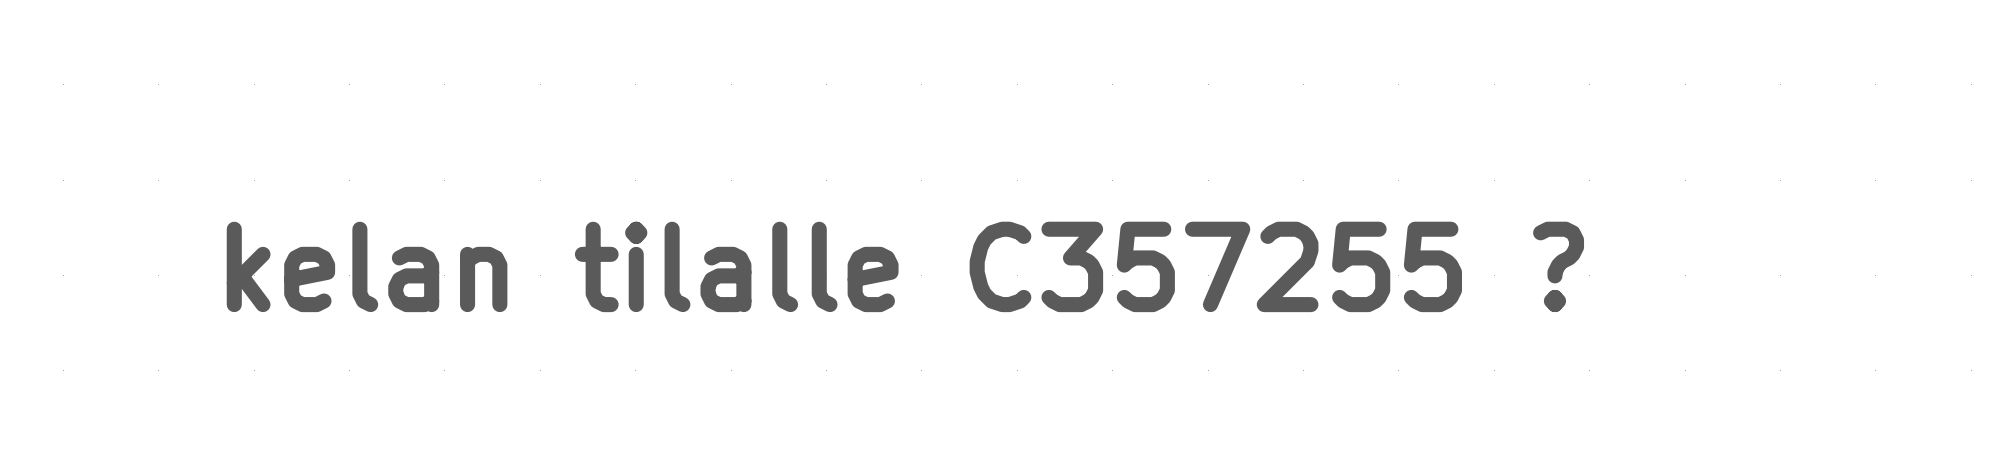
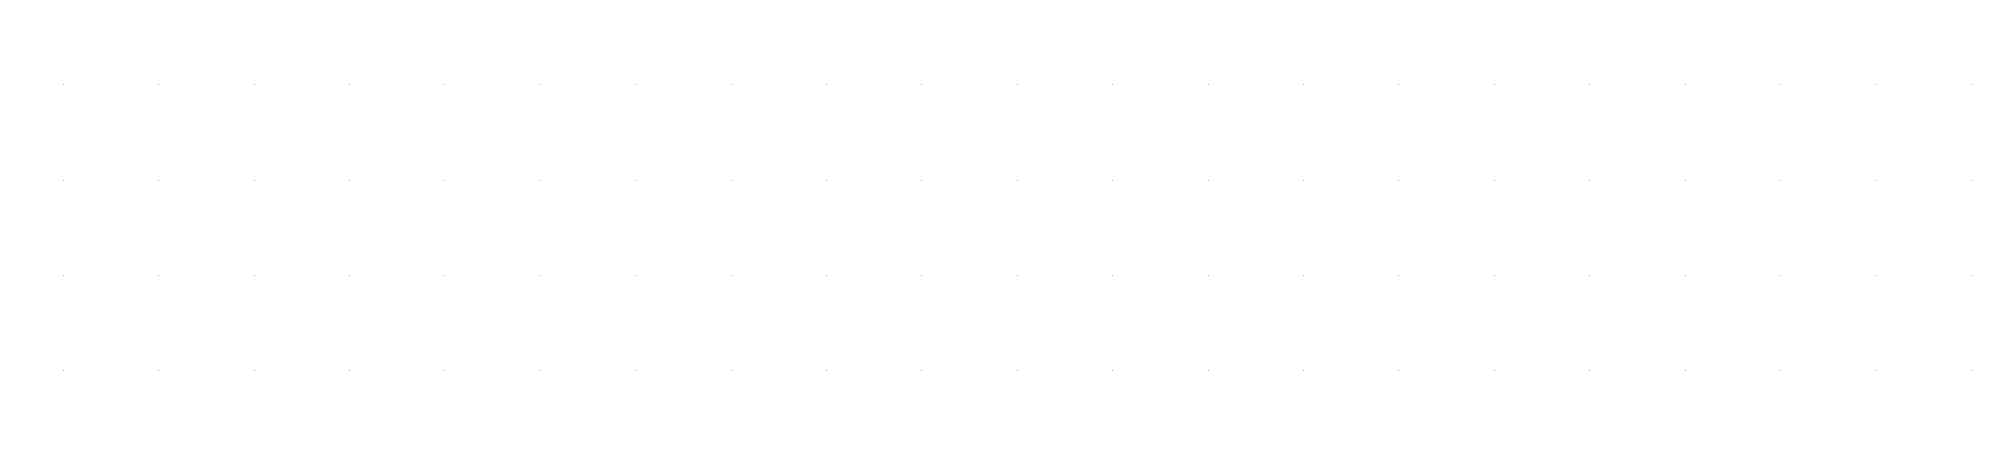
text: kelan tilalle C357255 ? (905, 266) -> none

